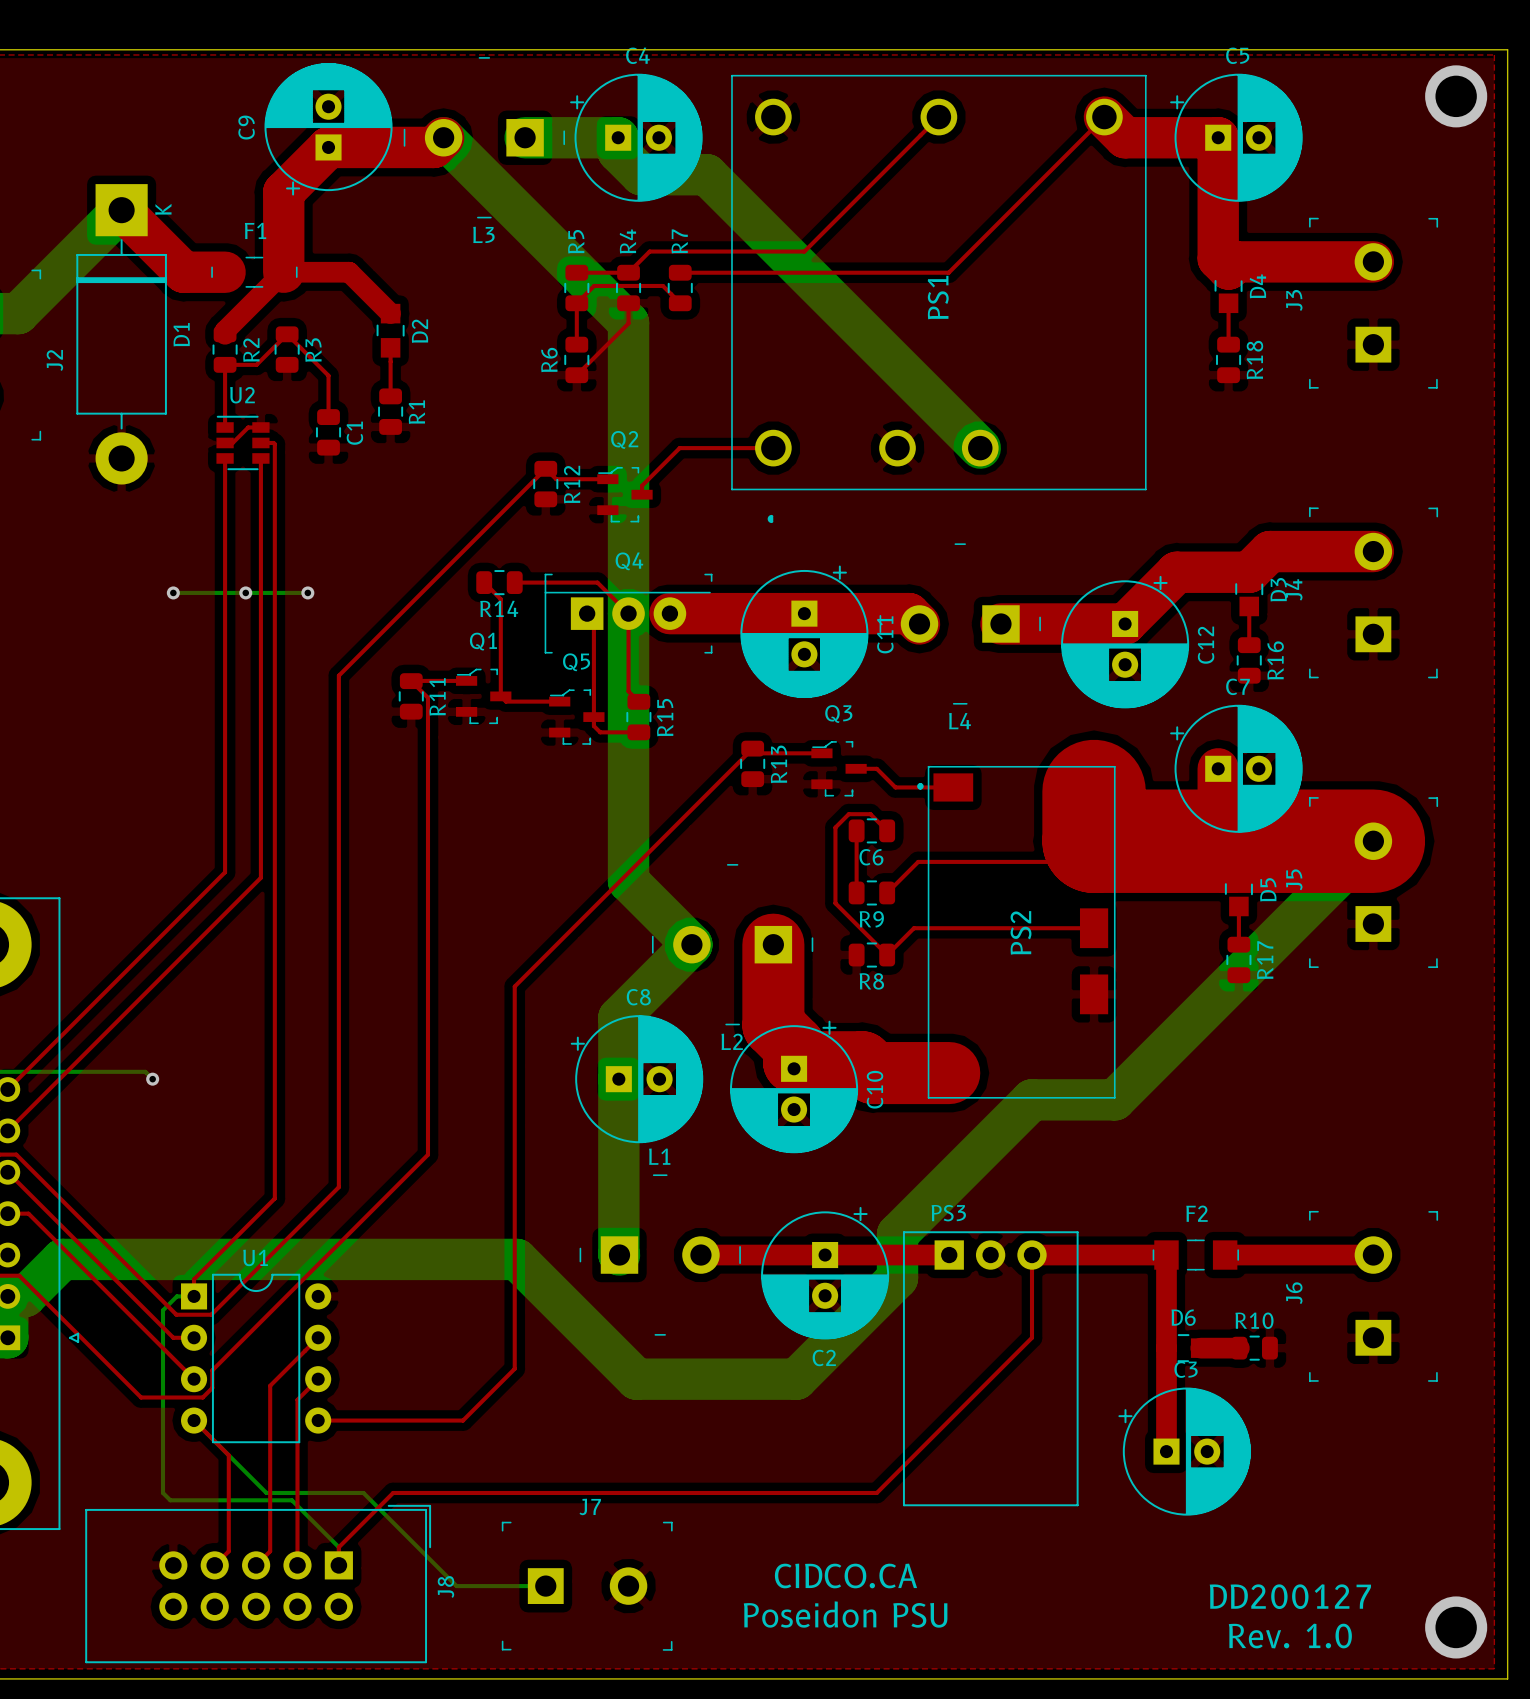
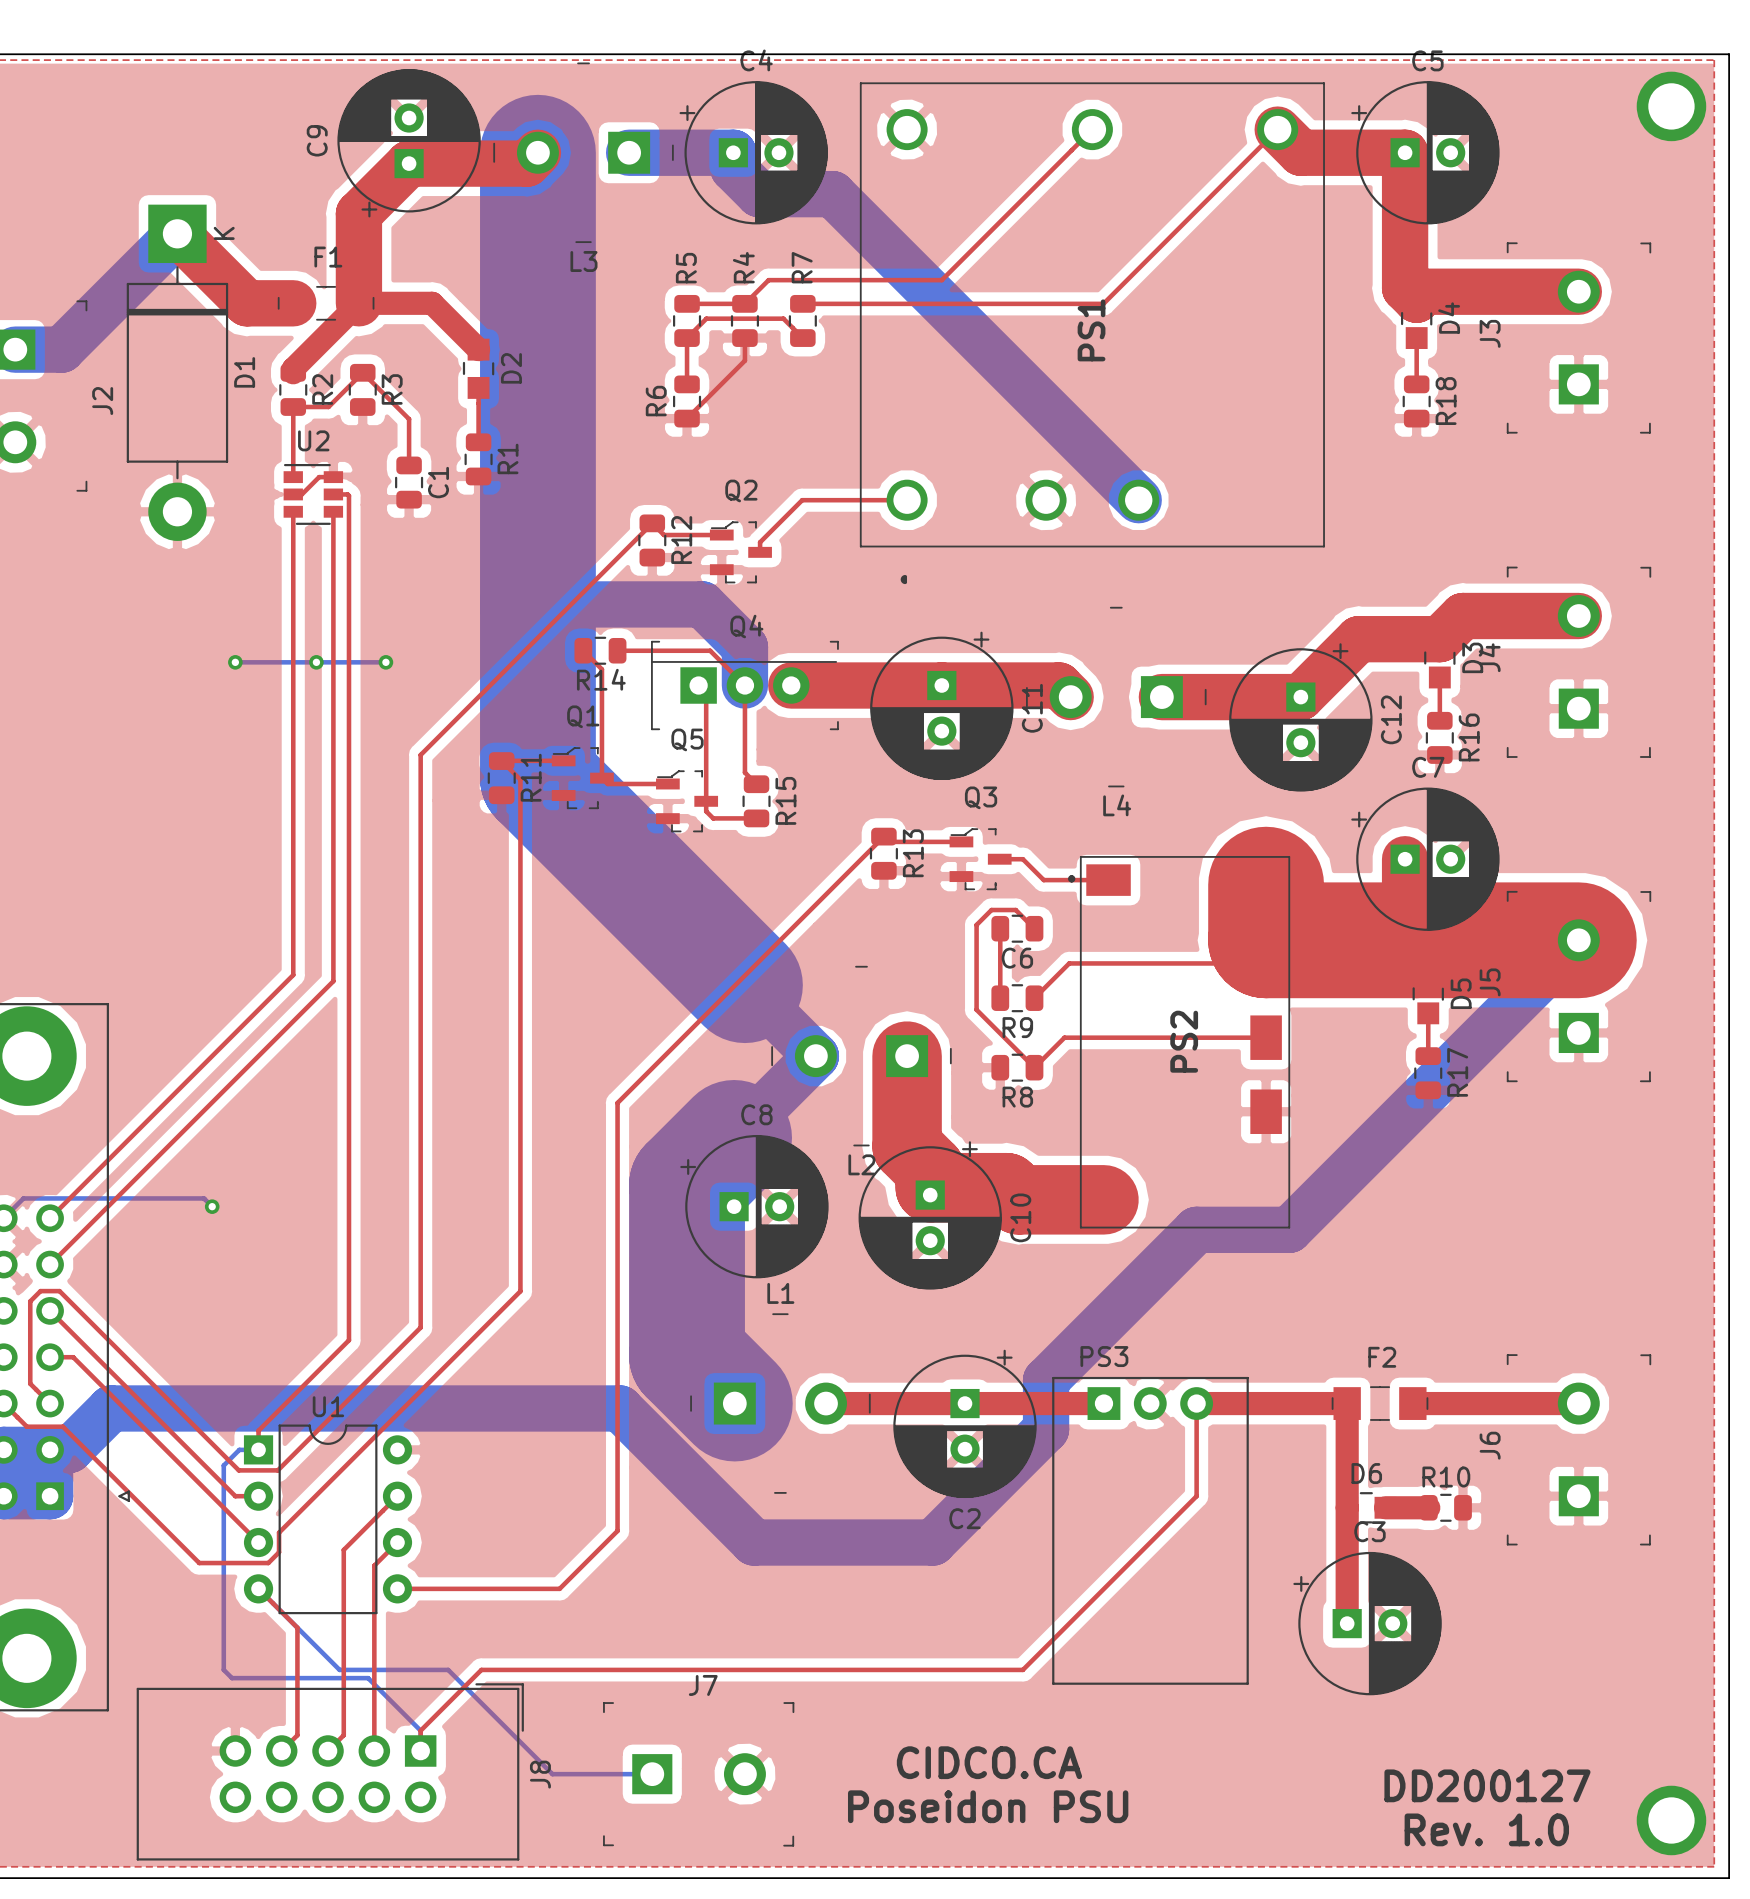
bottom track: (443, 137) (628, 322) (628, 579) -> (537, 152) (537, 778) (744, 985)
bottom track: none -> (537, 604) (702, 604) (744, 647)
bottom track: (628, 613) (628, 881) -> none
bottom track: (618, 1017) (618, 1254) -> (734, 1137) (687, 1184) (687, 1355) (734, 1403)

